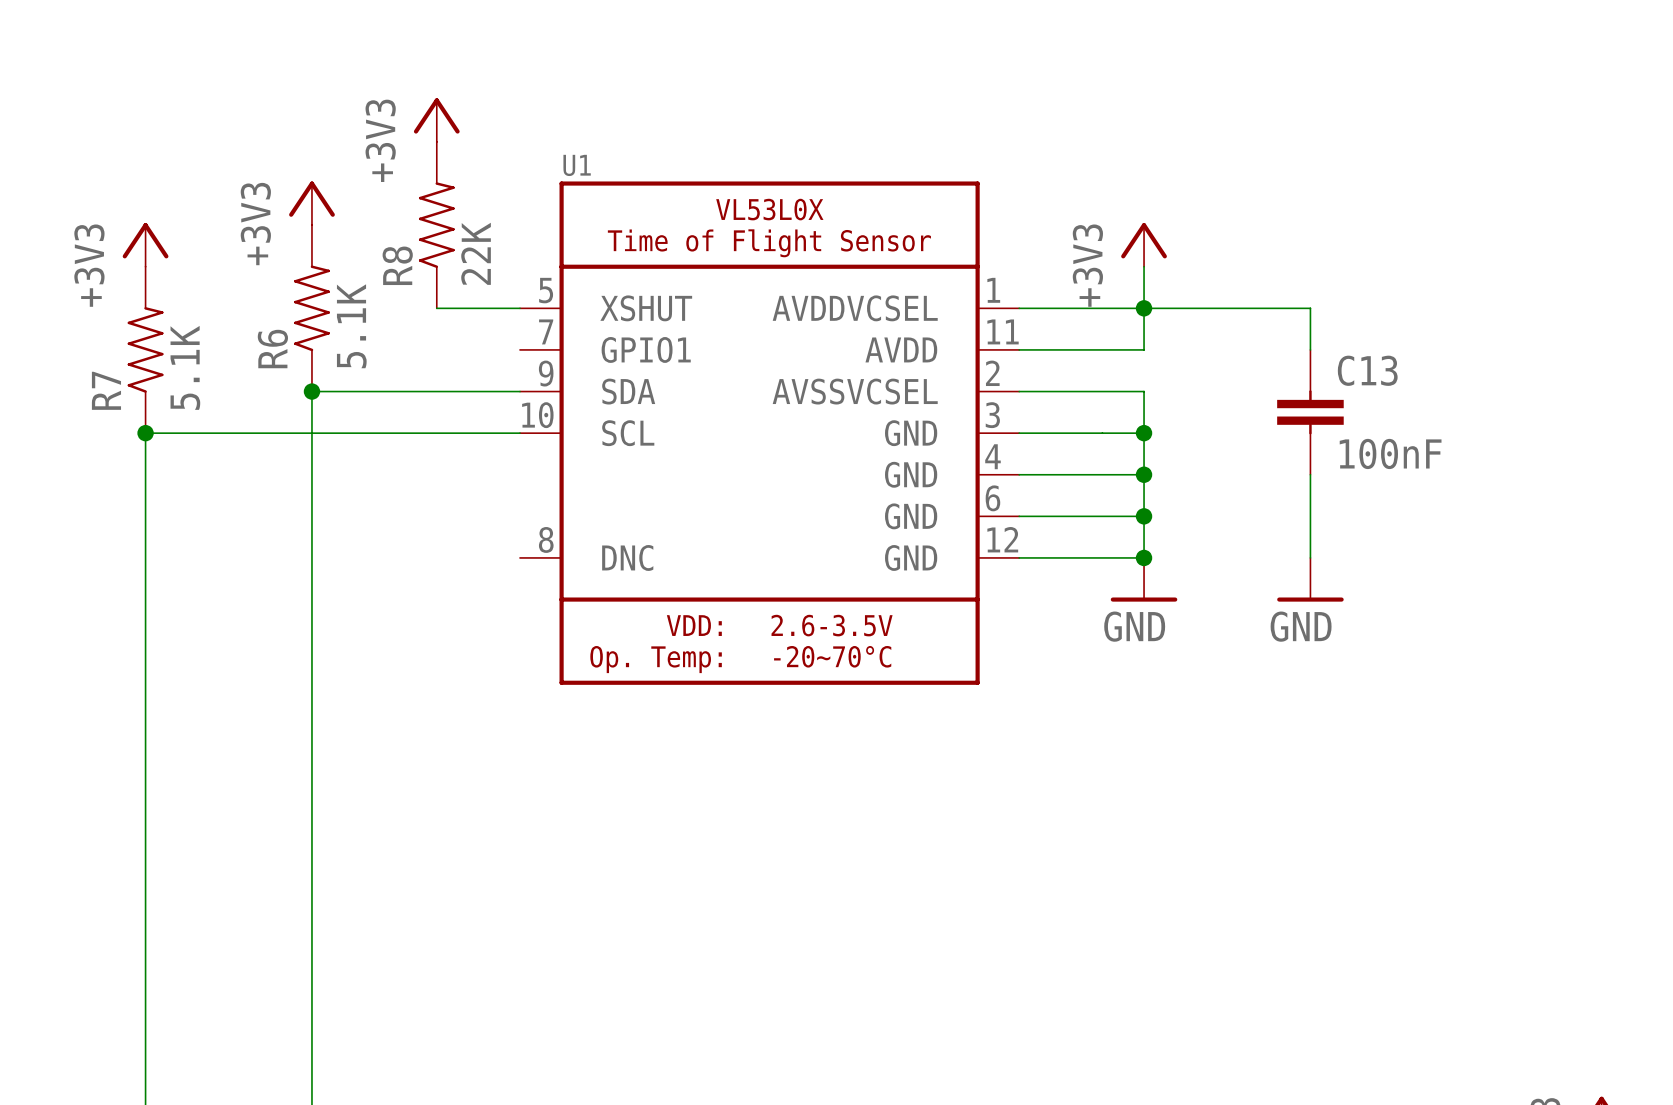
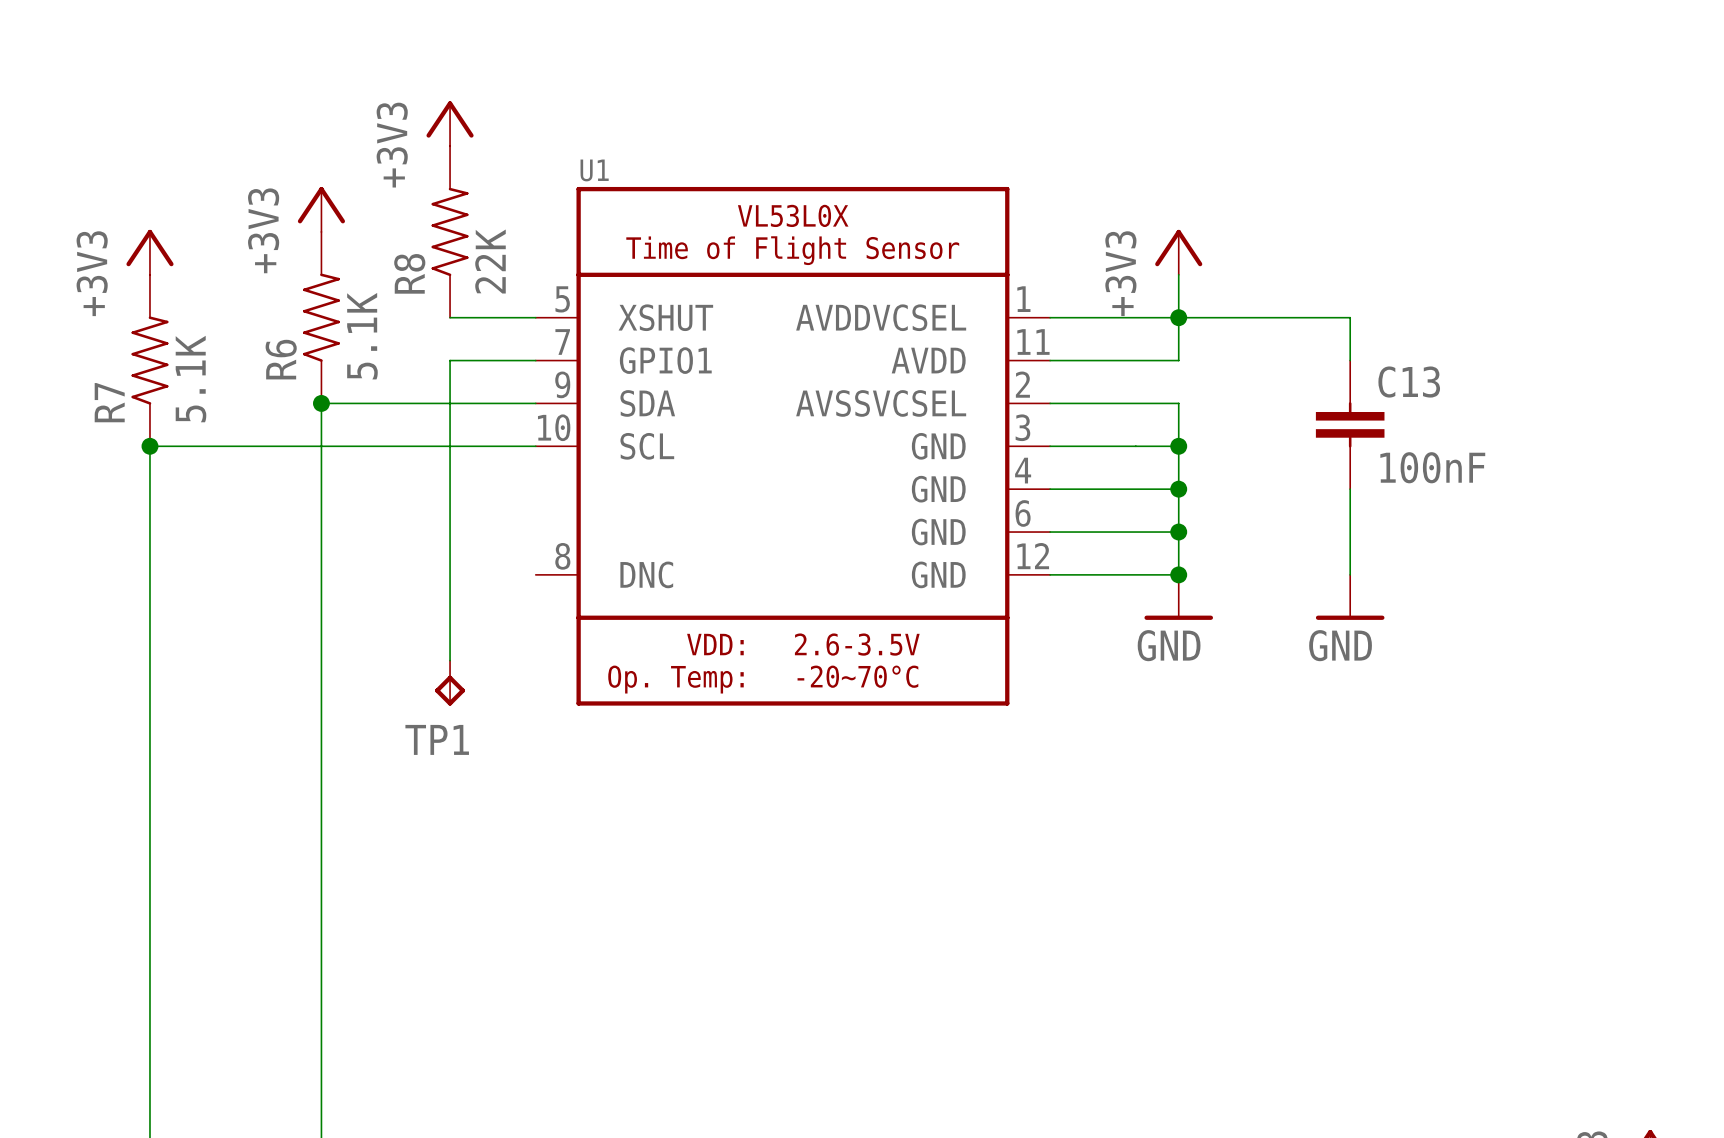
wire: none -> (535, 360) (450, 360) (450, 660)
TP1: none -> (450, 683)

